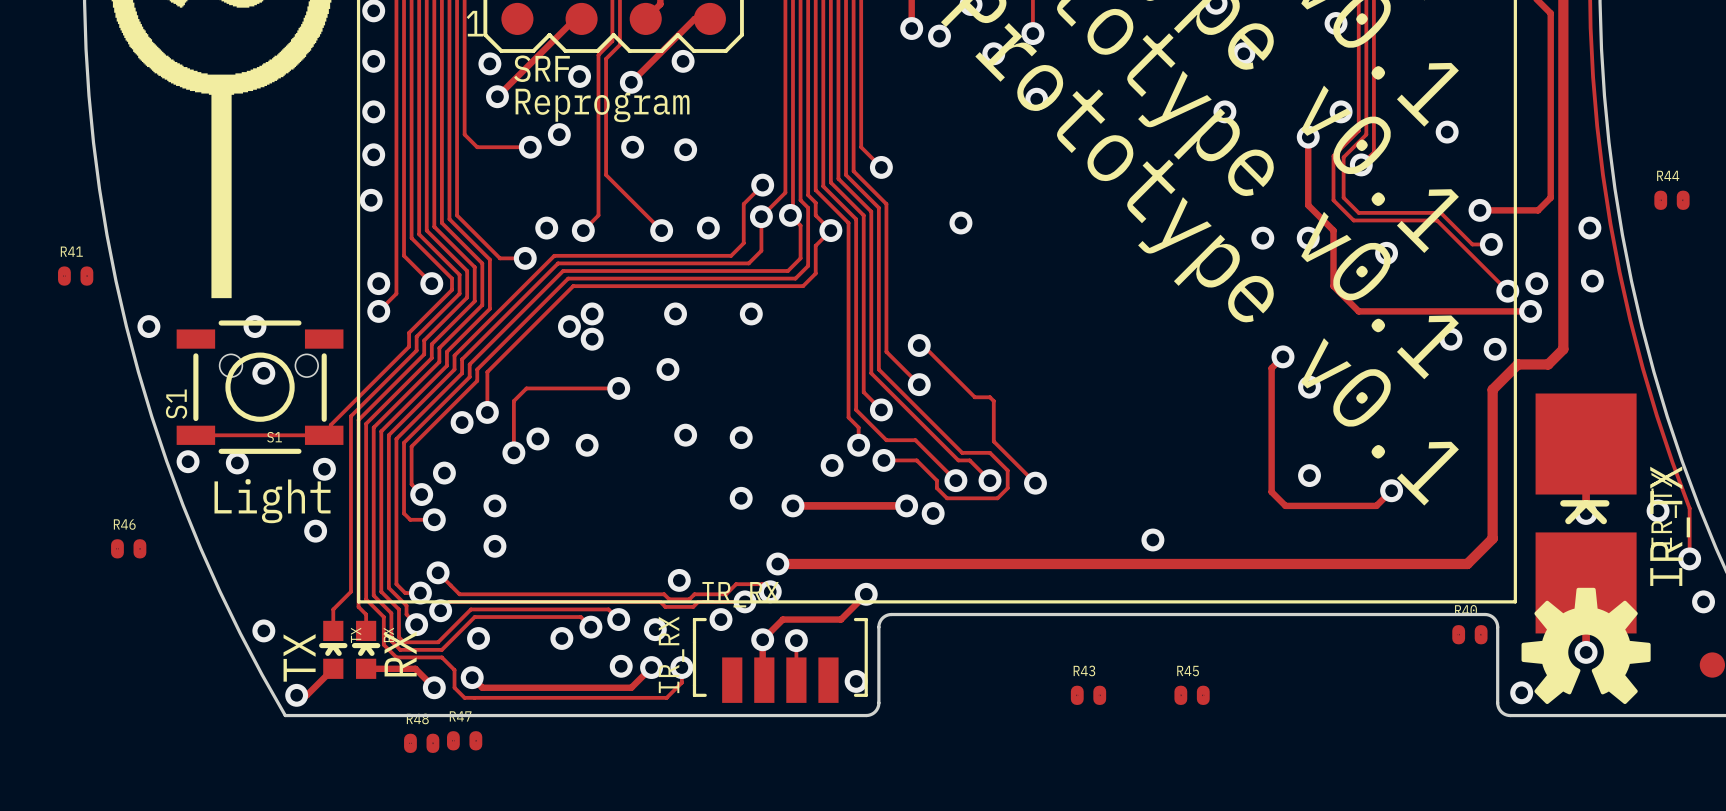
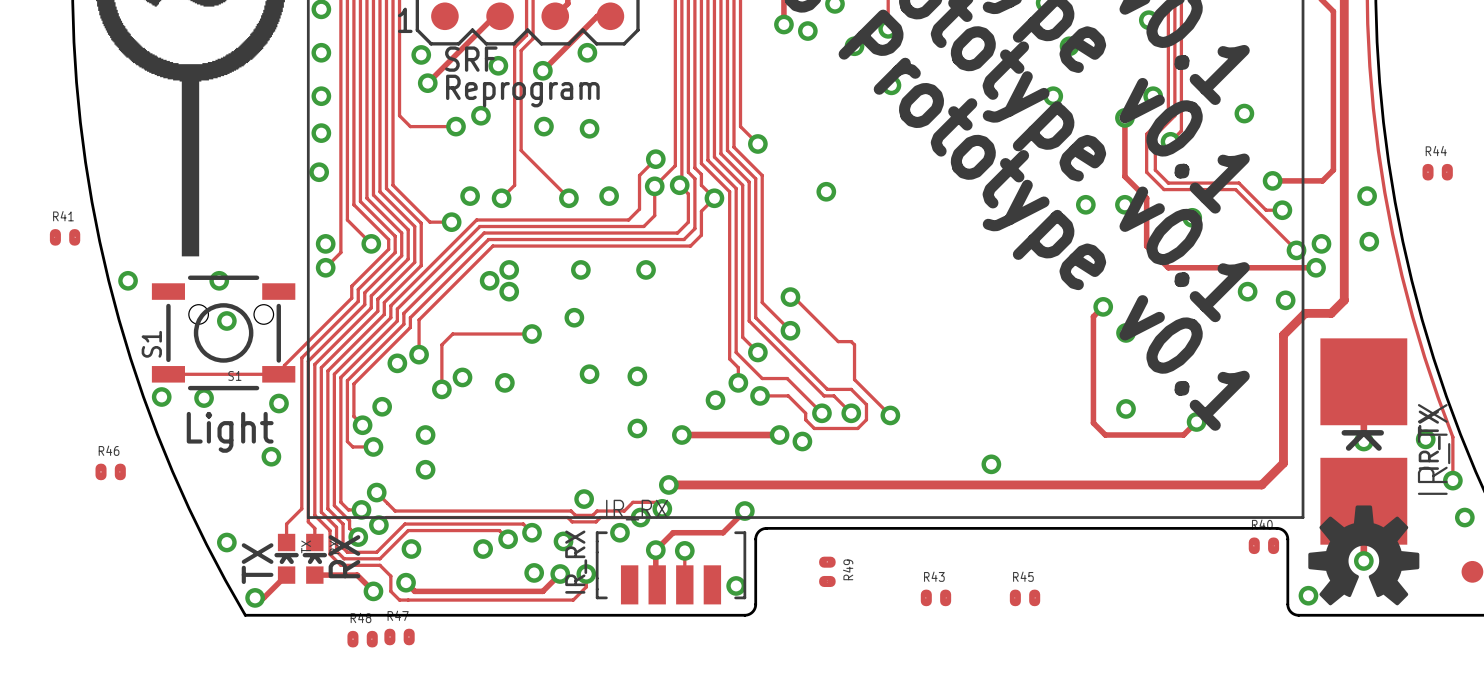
R49: none -> (827, 571)

